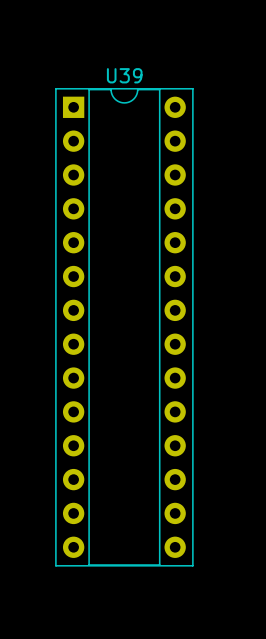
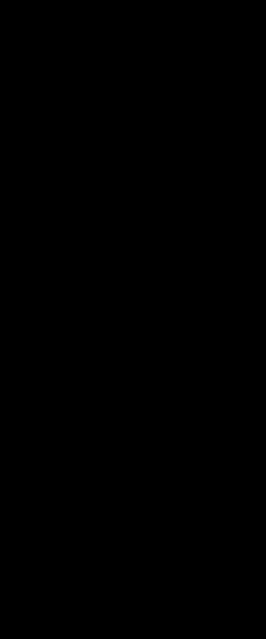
U39: (124, 327) -> none

